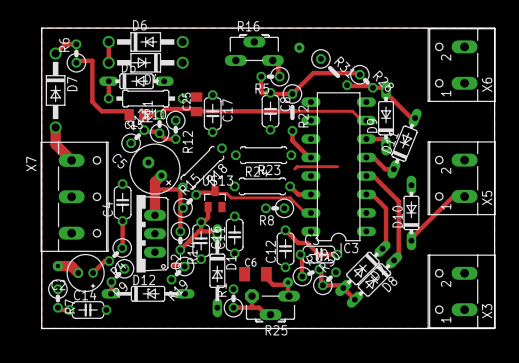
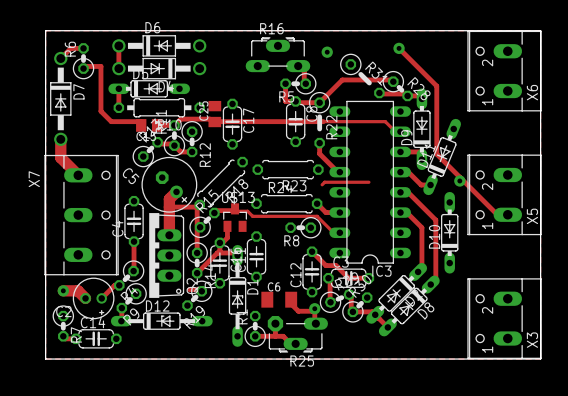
via: none -> (399, 48)
track: (386, 92) (411, 118) (415, 118) -> none
via: none -> (459, 180)
track: (455, 196) (411, 238) -> (497, 214) (436, 154) (436, 86) (399, 48)

